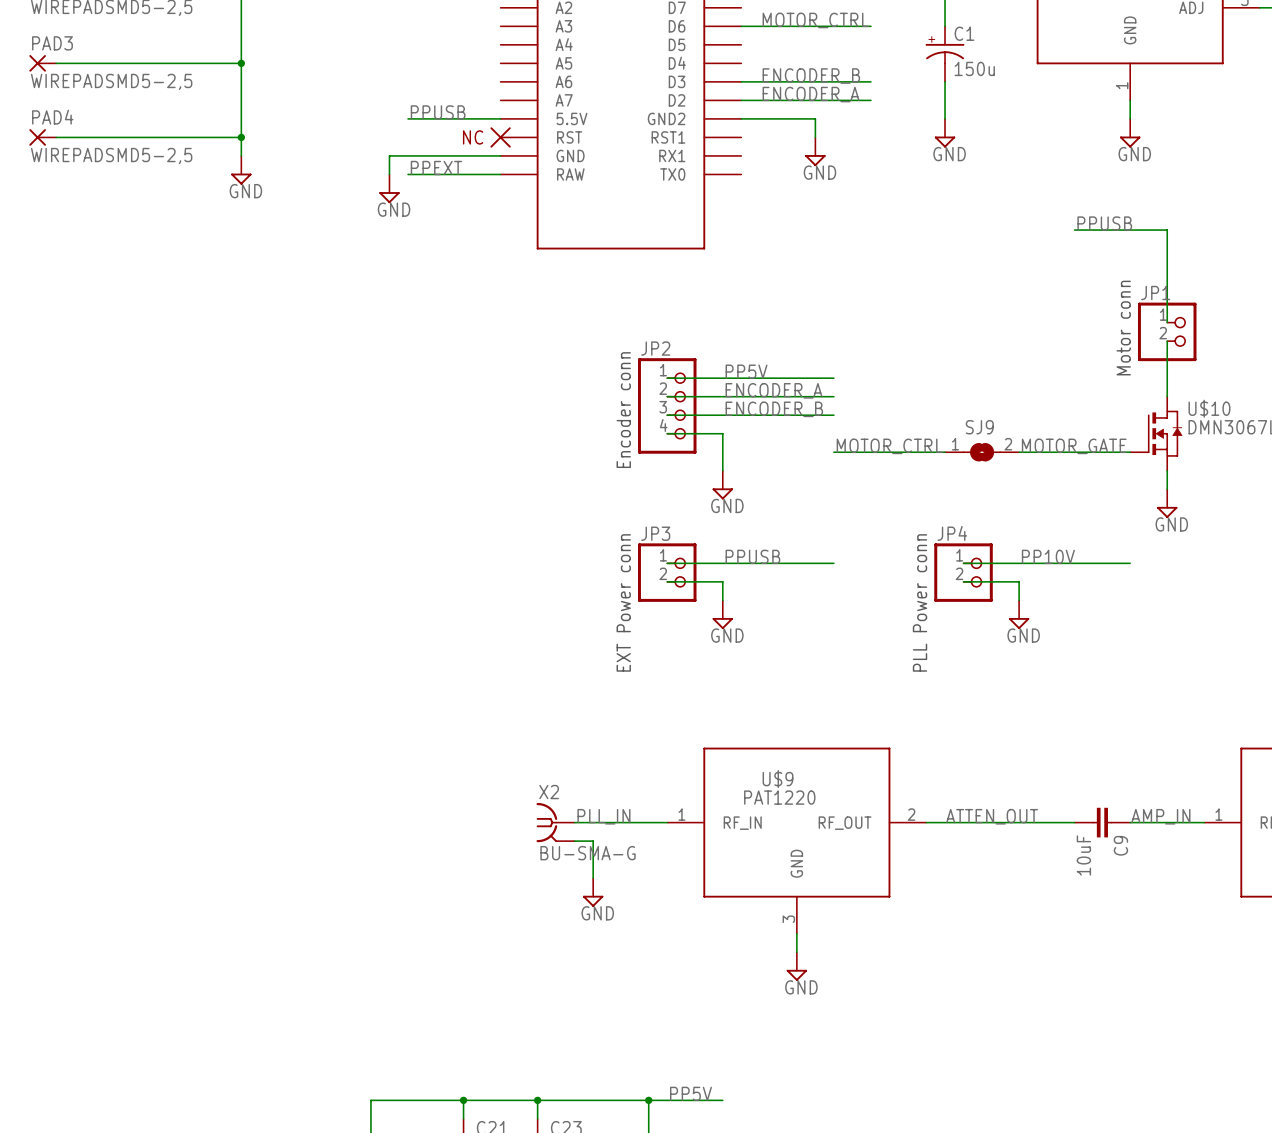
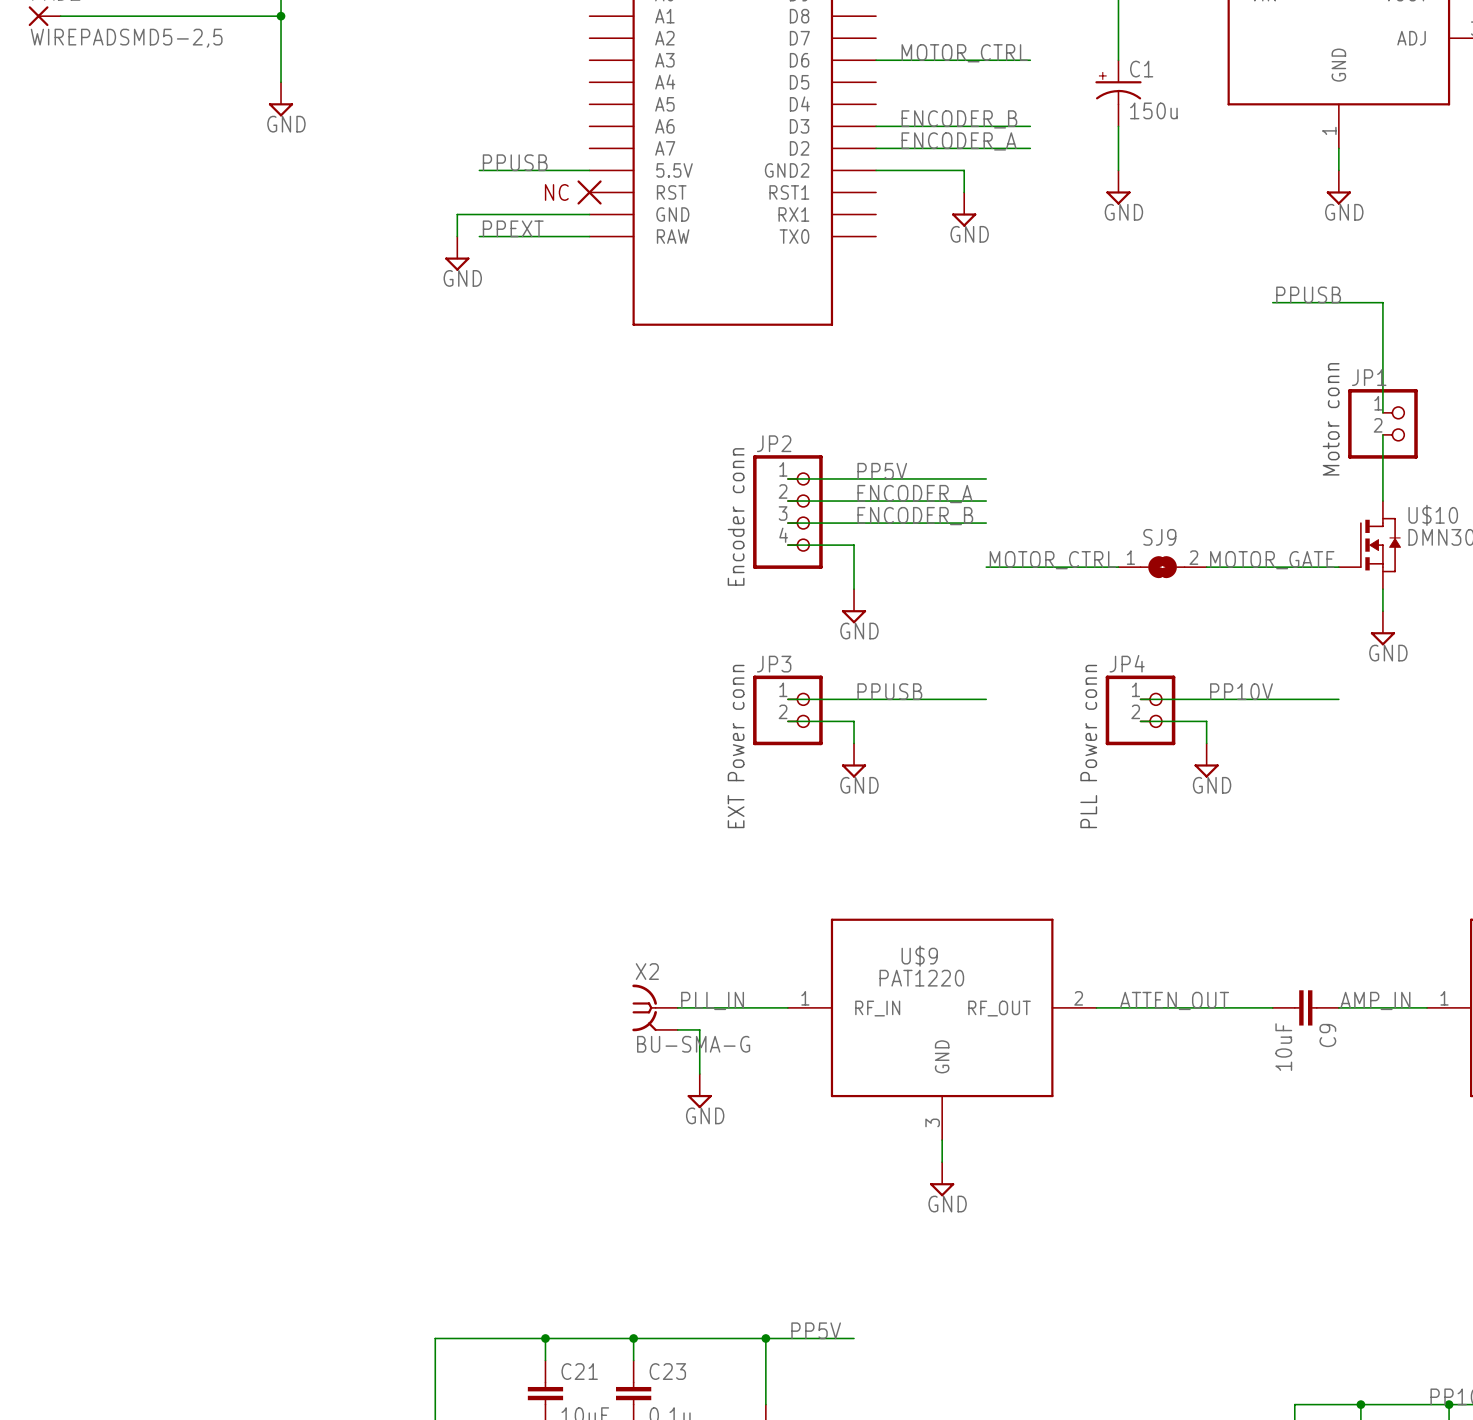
wire: (241, 44) (241, 155) -> none
PAD3: WIREPADSMD5-2,5 (42, 63) -> none
wire: (56, 63) (241, 63) -> none
junction: (241, 63) -> none
PAD4: WIREPADSMD5-2,5 (42, 137) -> none
wire: (56, 137) (241, 137) -> none
junction: (241, 137) -> none
power symbol position: GND (241, 170) -> GND (281, 99)

